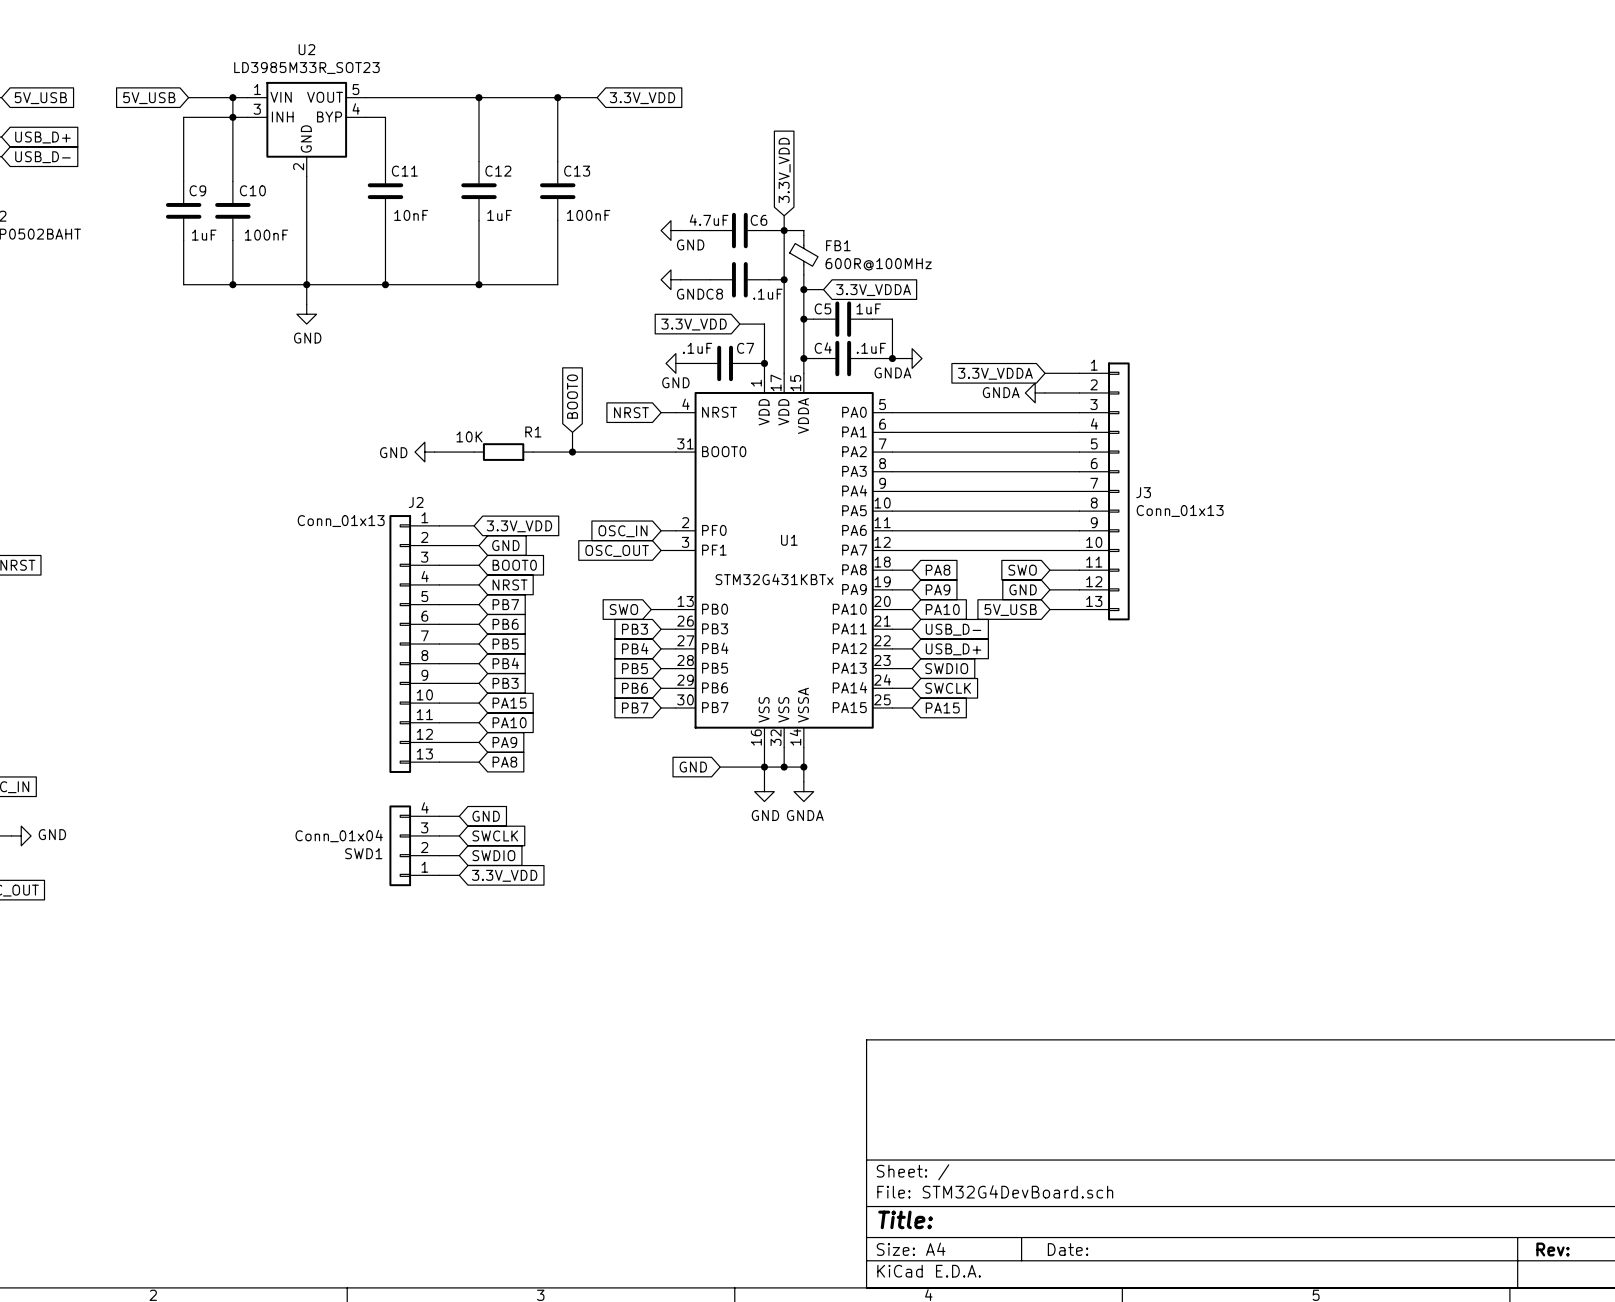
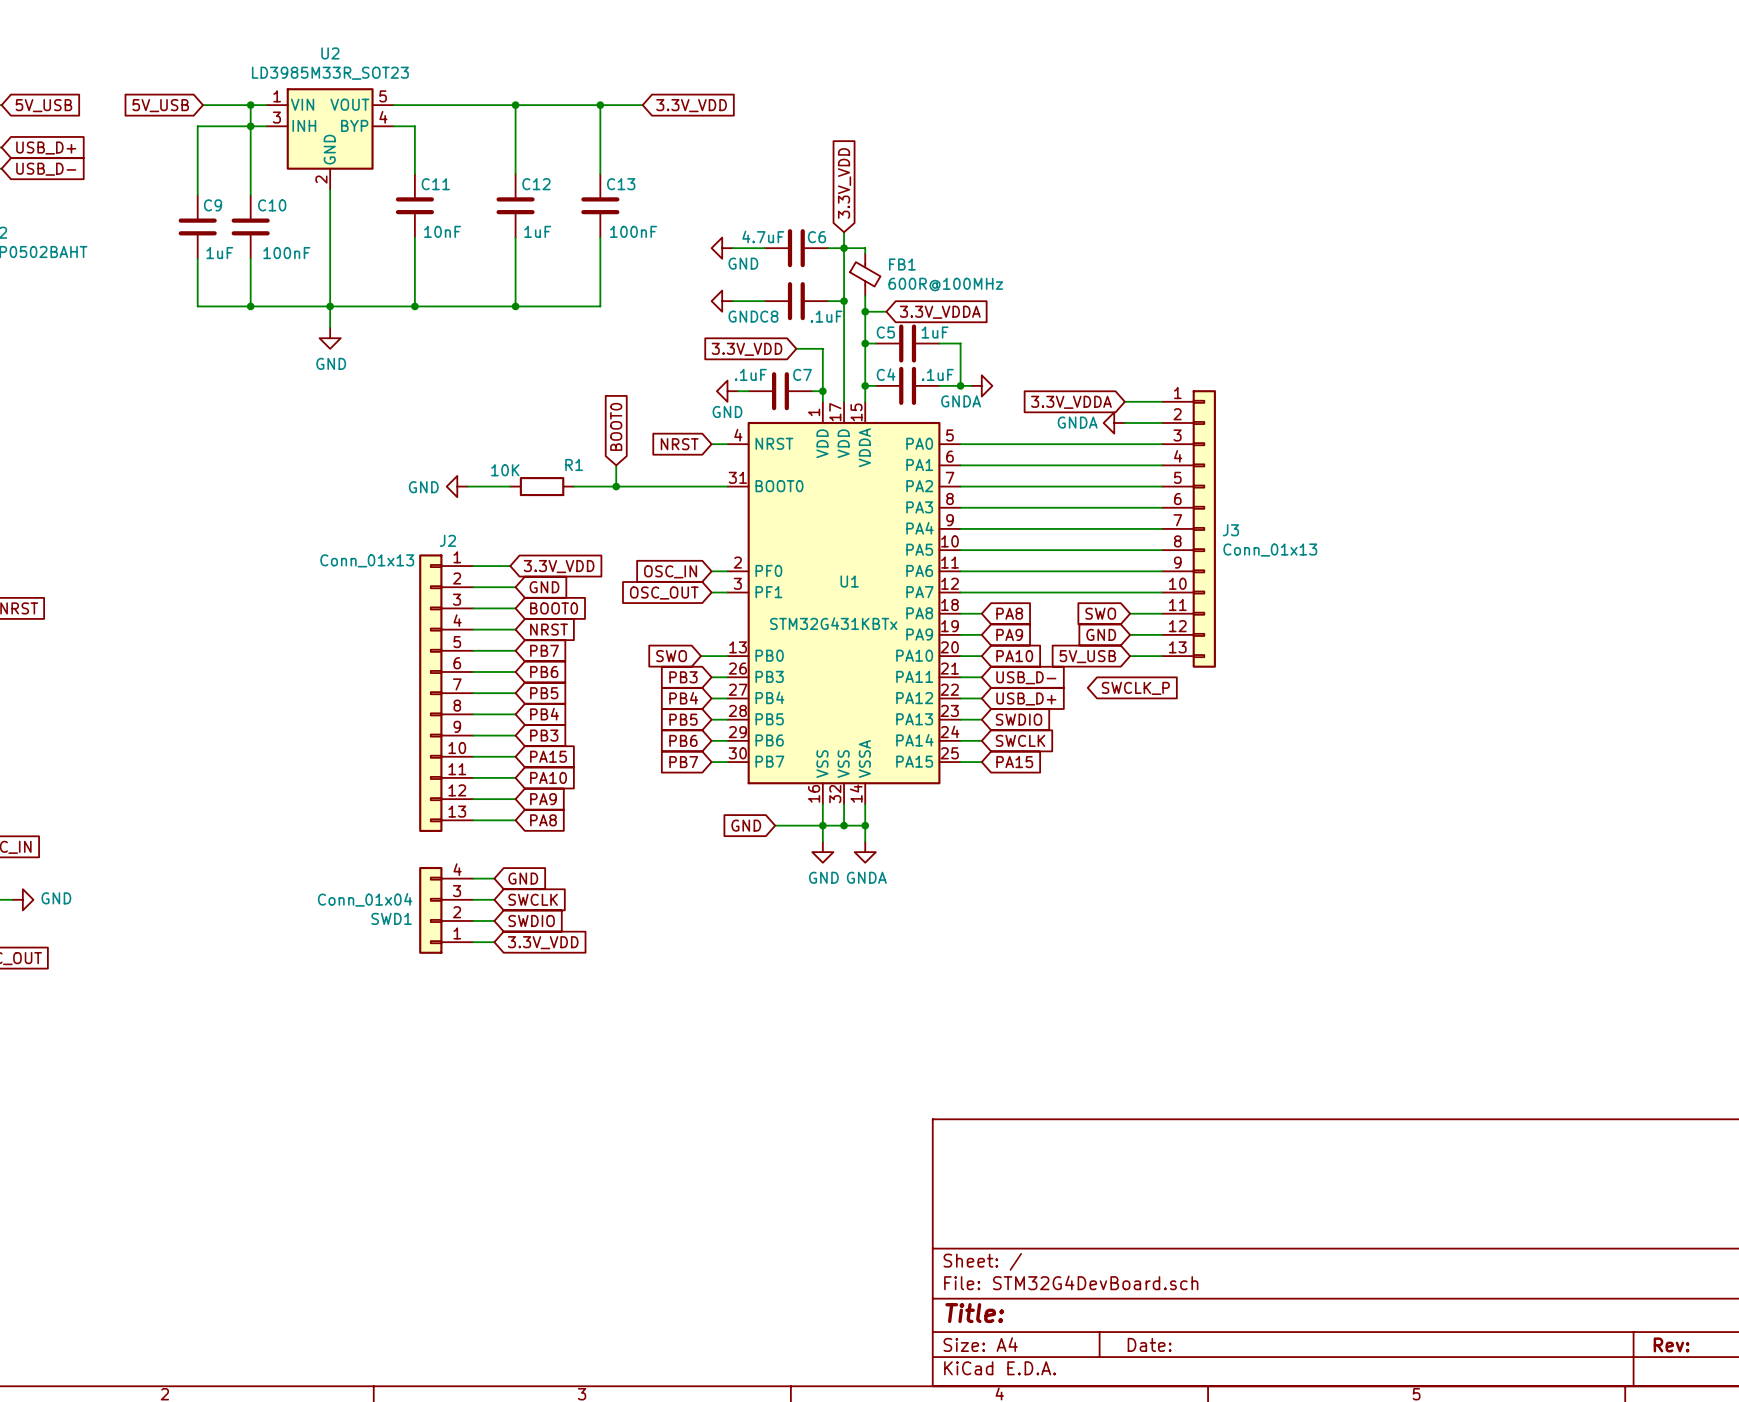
global label: none -> SWCLK_P (1135, 688)

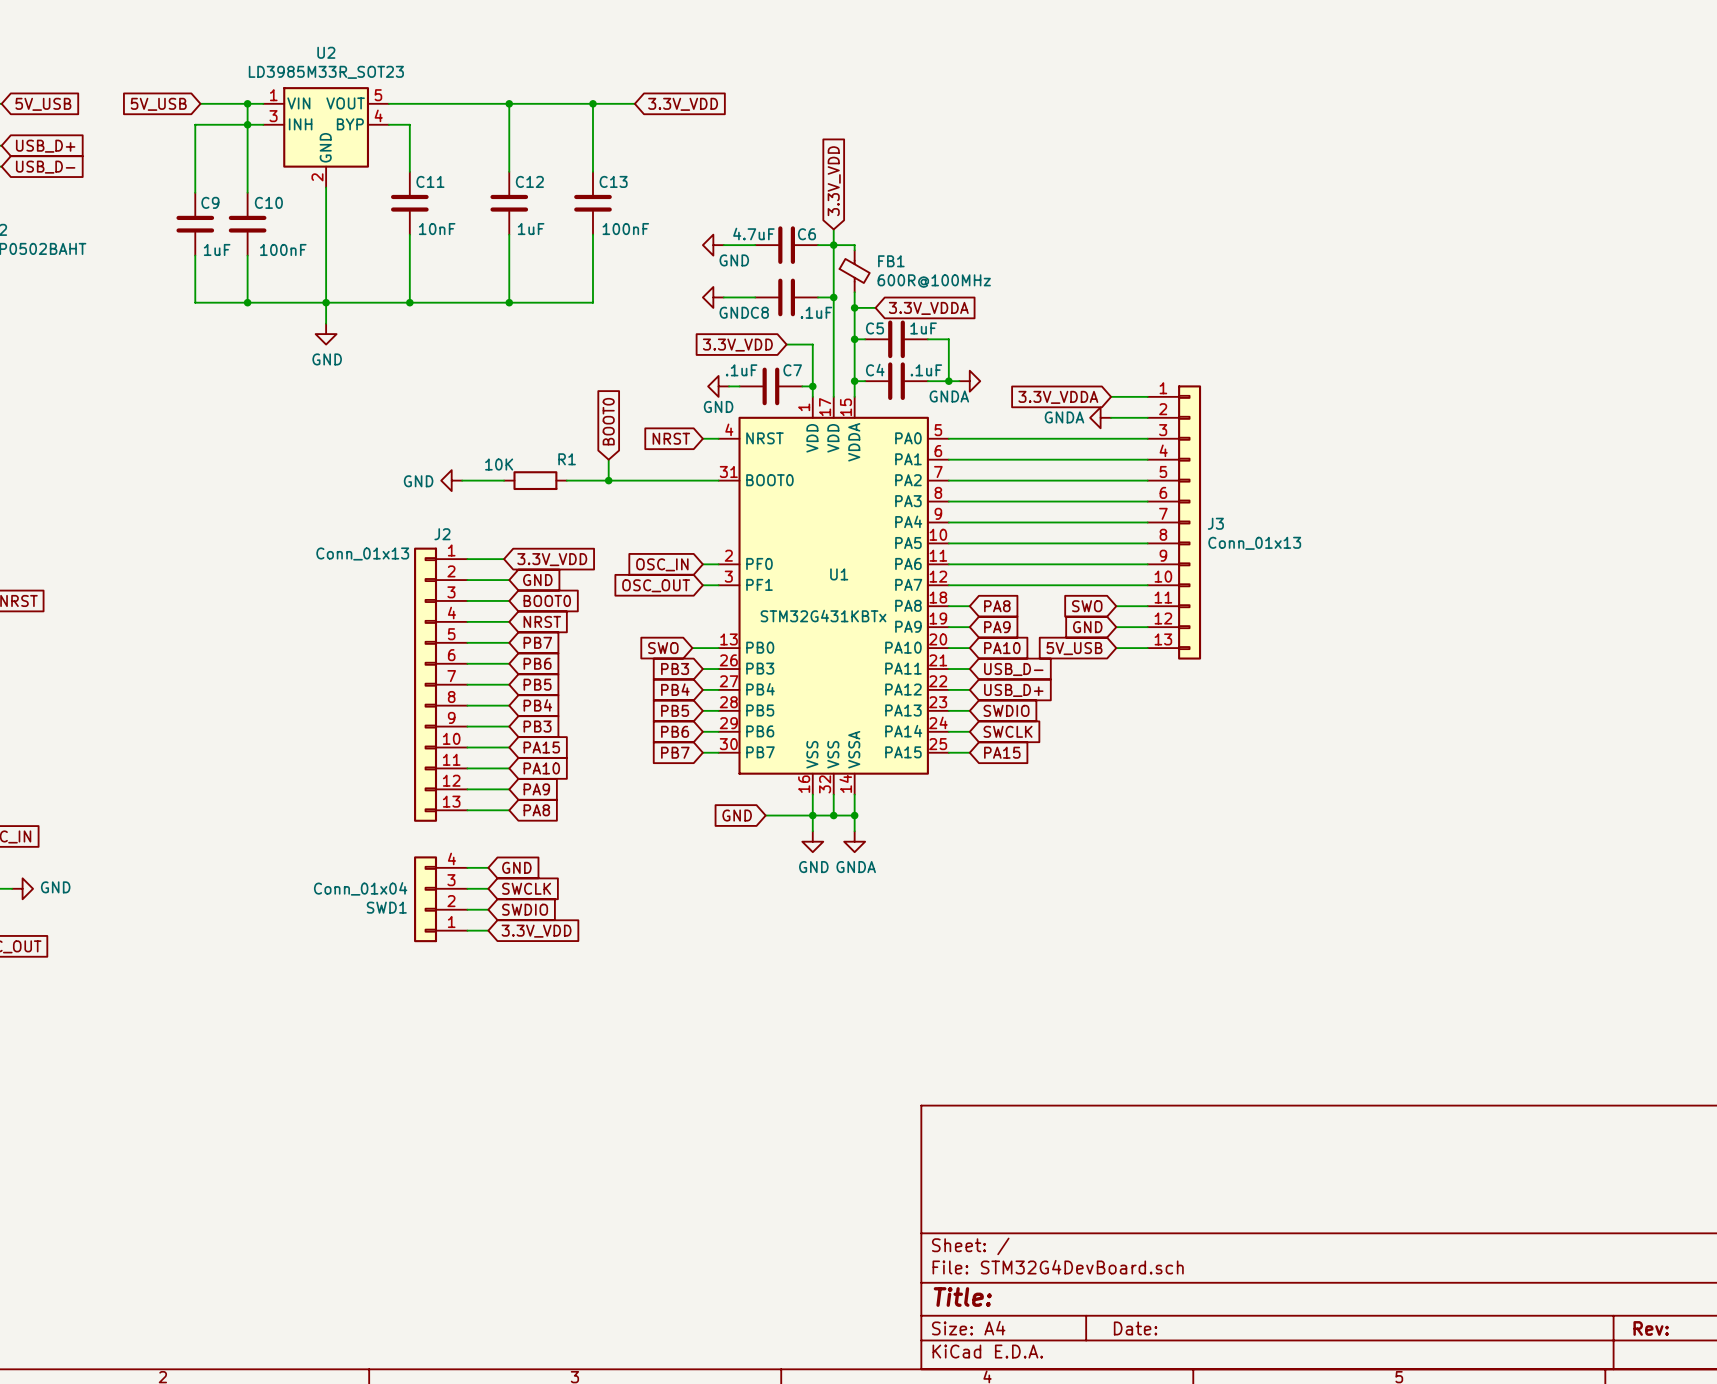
global label: SWCLK_P (1135, 688) -> none

